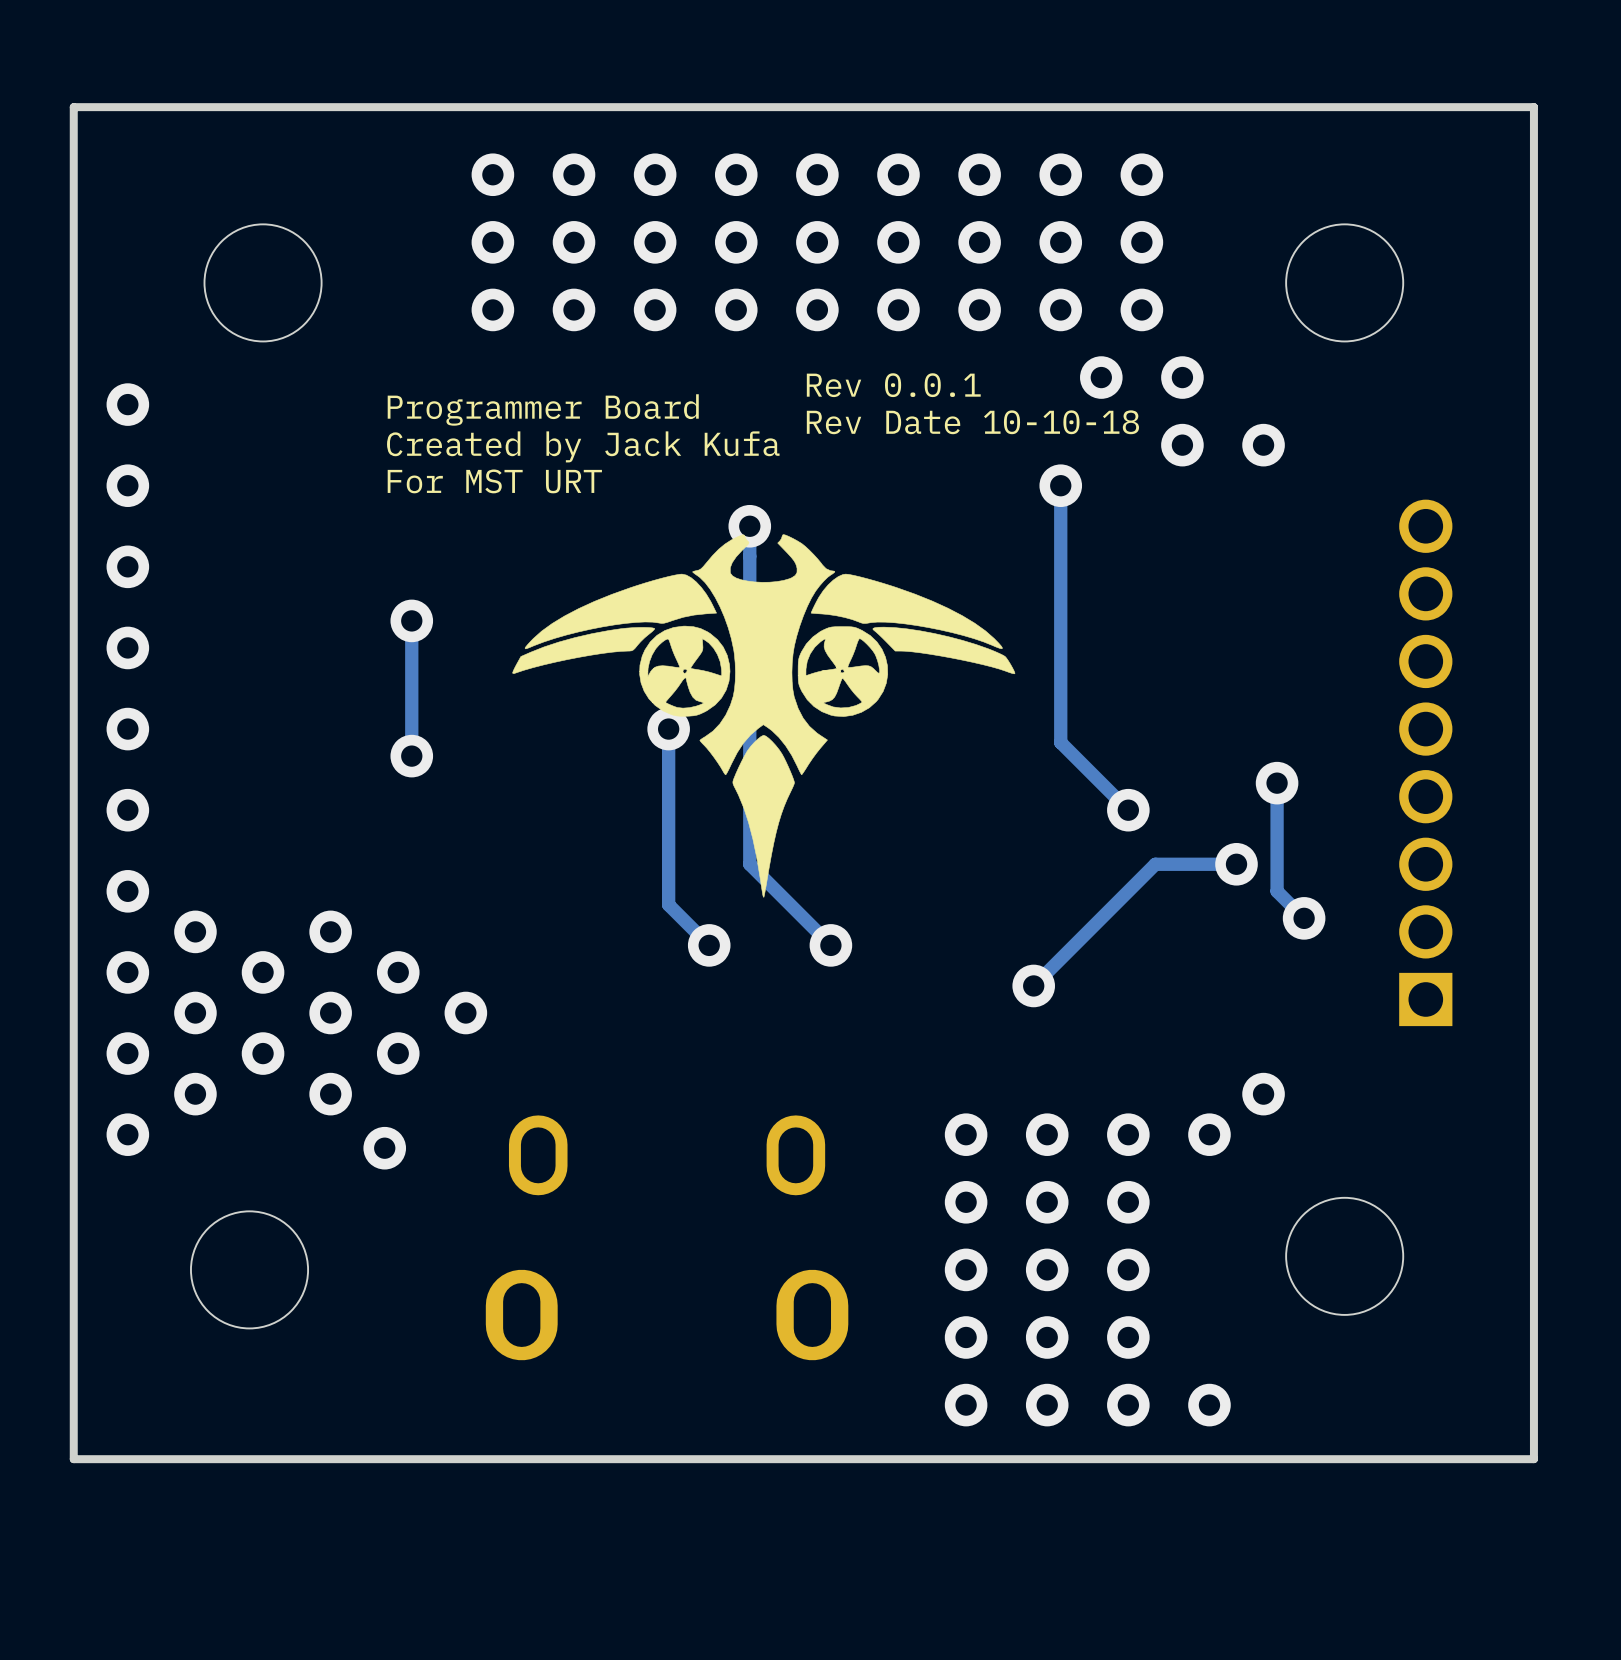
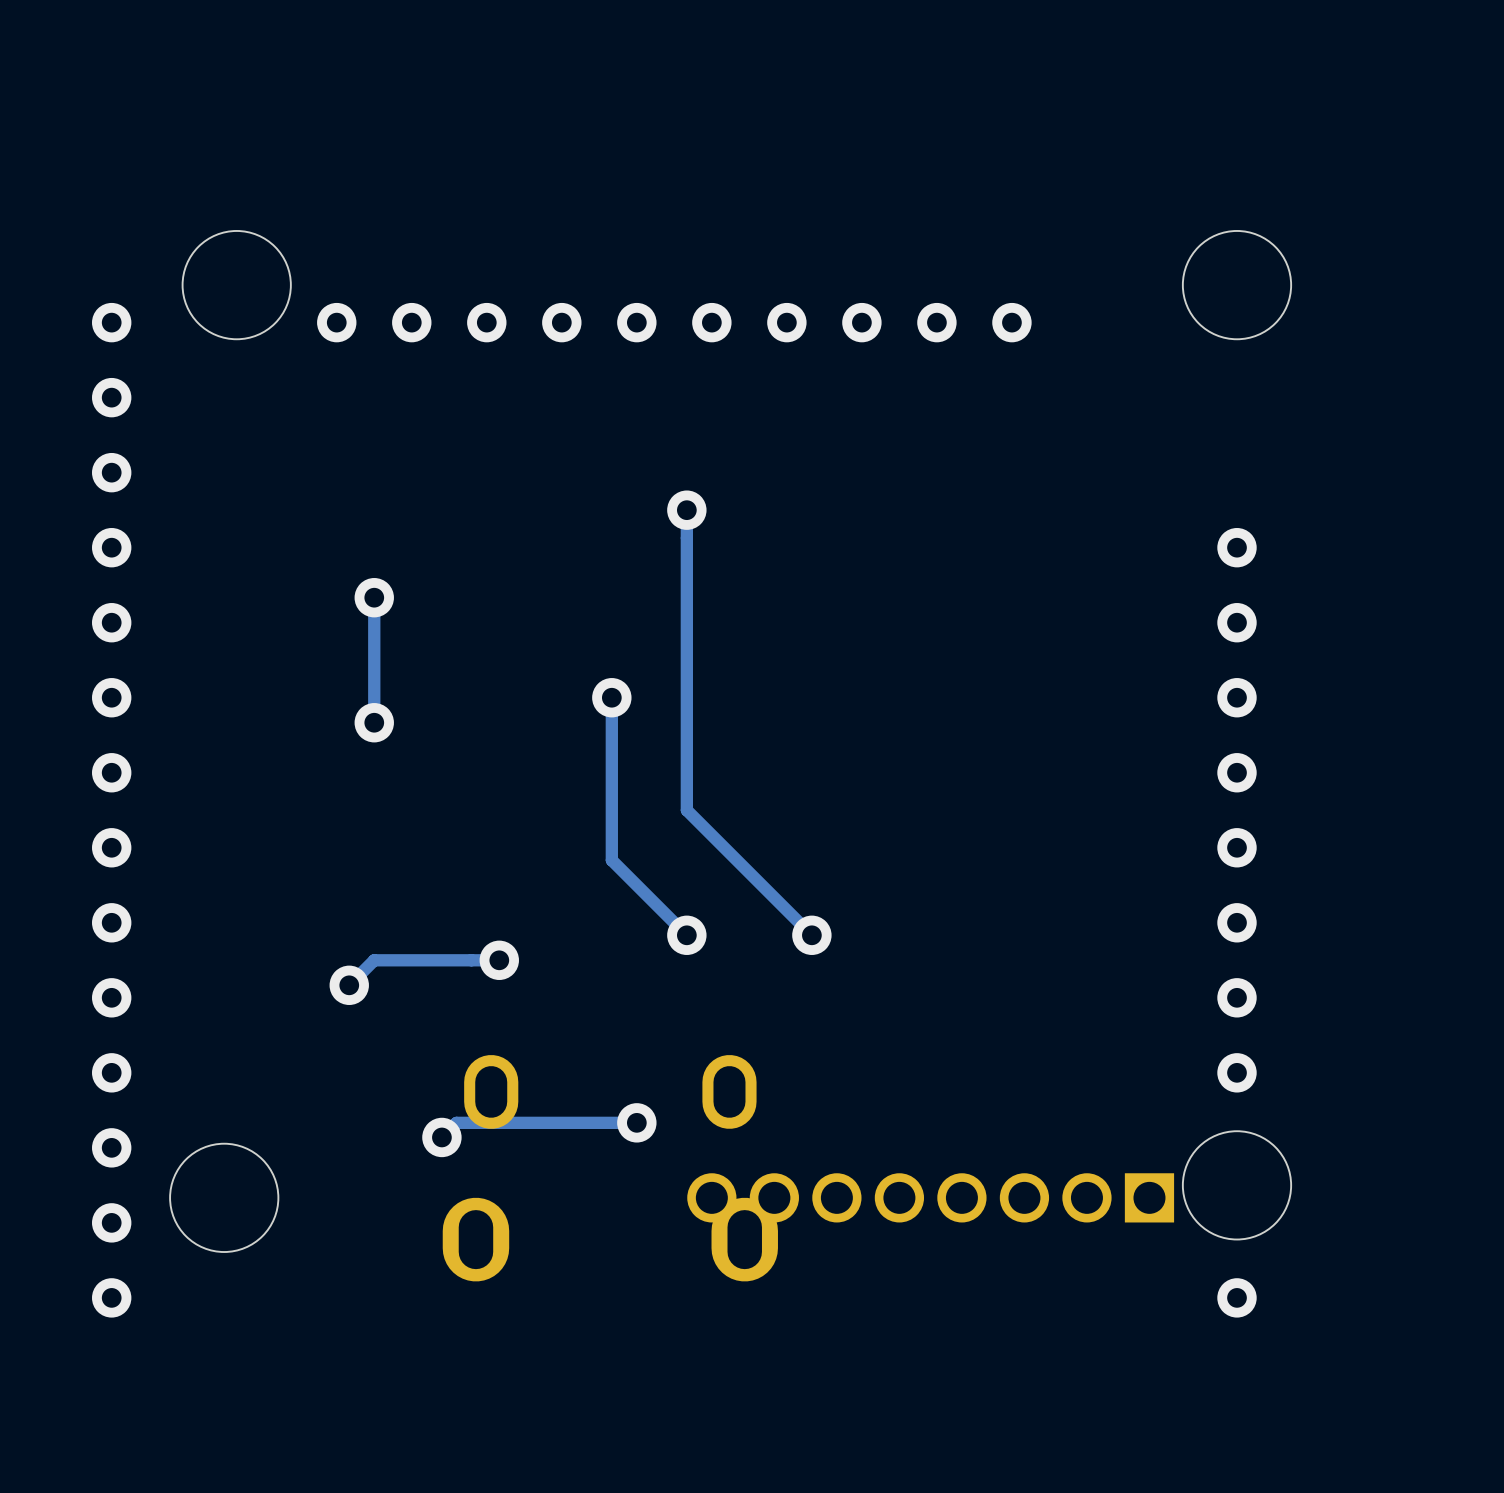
board edge: (1533, 107) (1533, 1459) (73, 1459) (73, 107) (1533, 107) -> none
via: (492, 174) -> none
via: (574, 174) -> none
via: (655, 174) -> none
via: (736, 174) -> none
via: (817, 174) -> none
via: (898, 174) -> none
via: (979, 174) -> none
via: (1060, 174) -> none
via: (1141, 174) -> none
via: (492, 242) -> none
via: (574, 242) -> none
via: (655, 242) -> none
via: (736, 242) -> none
via: (817, 242) -> none
via: (898, 242) -> none
via: (979, 242) -> none
via: (1060, 242) -> none
via: (1141, 242) -> none
via: (492, 309) -> none
via: (574, 309) -> none
via: (655, 309) -> none
via: (736, 309) -> none
via: (817, 309) -> none
via: (898, 309) -> none
via: (979, 309) -> none
via: (1060, 309) -> none
via: (1141, 309) -> none
via: none -> (111, 322)
via: none -> (336, 322)
via: none -> (411, 322)
via: none -> (486, 322)
via: none -> (561, 322)
via: none -> (636, 322)
via: none -> (711, 322)
via: none -> (786, 322)
via: none -> (861, 322)
via: none -> (936, 322)
via: none -> (1011, 322)
via: (1101, 377) -> none
via: (1182, 377) -> none
text: Rev 0.0.1 (893, 385) -> none
text: Programmer Board (543, 409) -> none
text: Rev Date 10-10-18 (972, 422) -> none
via: (1182, 445) -> none
via: (1263, 445) -> none
text: Created by Jack Kufa (583, 446) -> none
text: For MST URT (494, 481) -> none
track: (1060, 485) (1060, 742) (1128, 810) -> none
via: (1060, 485) -> none
drawing: [512, 534, 1016, 898] -> none
via: none -> (1237, 547)
via: none -> (1237, 622)
via: none -> (1237, 697)
part rotation: 0° (1425, 762) -> 90° counterclockwise (930, 1197)
part position: (1425, 762) -> (930, 1197)
track: (1277, 783) (1277, 891) (1304, 918) -> none
via: (1277, 783) -> none
via: (1128, 810) -> none
via: none -> (1237, 772)
track: (749, 850) (749, 864) (830, 945) -> (686, 810) (811, 935)
track: (1236, 864) (1155, 864) (1033, 985) -> none
via: (1236, 864) -> none
via position: (1304, 918) -> (1237, 847)
via: (195, 931) -> none
via: (330, 931) -> none
track: none -> (649, 897) (686, 935)
via: (709, 945) -> none
via: (830, 945) -> none
via: (263, 972) -> none
via: (398, 972) -> none
via: none -> (1237, 922)
via: none -> (686, 935)
via: none -> (811, 935)
via: (1033, 985) -> none
via: (195, 1013) -> none
via: (330, 1013) -> none
via: (465, 1013) -> none
track: none -> (499, 960) (374, 960) (349, 985)
via: none -> (499, 960)
via: (263, 1053) -> none
via position: (398, 1053) -> (349, 985)
via: none -> (1237, 997)
via: (195, 1094) -> none
via: (330, 1094) -> none
via: (1263, 1094) -> none
via: (966, 1134) -> none
via: (1047, 1134) -> none
via: (1128, 1134) -> none
via: (1209, 1134) -> none
via: none -> (1237, 1072)
via: (384, 1148) -> none
track: none -> (636, 1122) (456, 1122) (441, 1137)
via: none -> (636, 1122)
via: (966, 1202) -> none
via: (1047, 1202) -> none
via: (1128, 1202) -> none
via: none -> (441, 1137)
via: none -> (111, 1147)
via: (966, 1269) -> none
via: (1047, 1269) -> none
via: (1128, 1269) -> none
via: none -> (111, 1222)
via: (966, 1337) -> none
via: (1047, 1337) -> none
via: (1128, 1337) -> none
via: none -> (111, 1297)
via: none -> (1237, 1297)
via: (966, 1405) -> none
via: (1047, 1405) -> none
via: (1128, 1405) -> none
via: (1209, 1405) -> none

